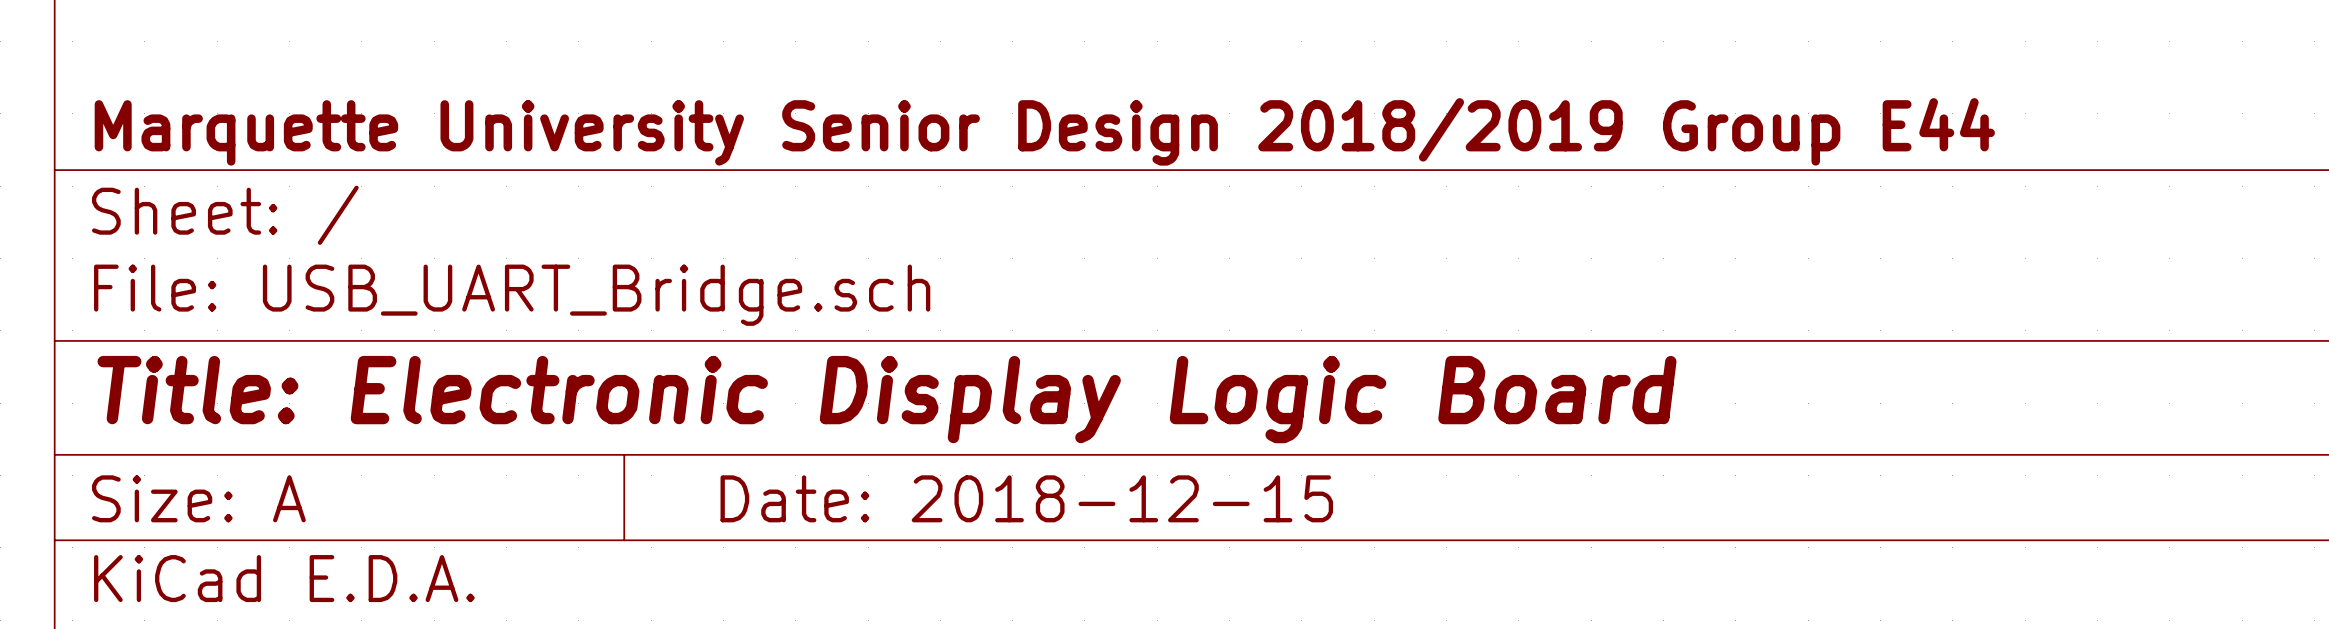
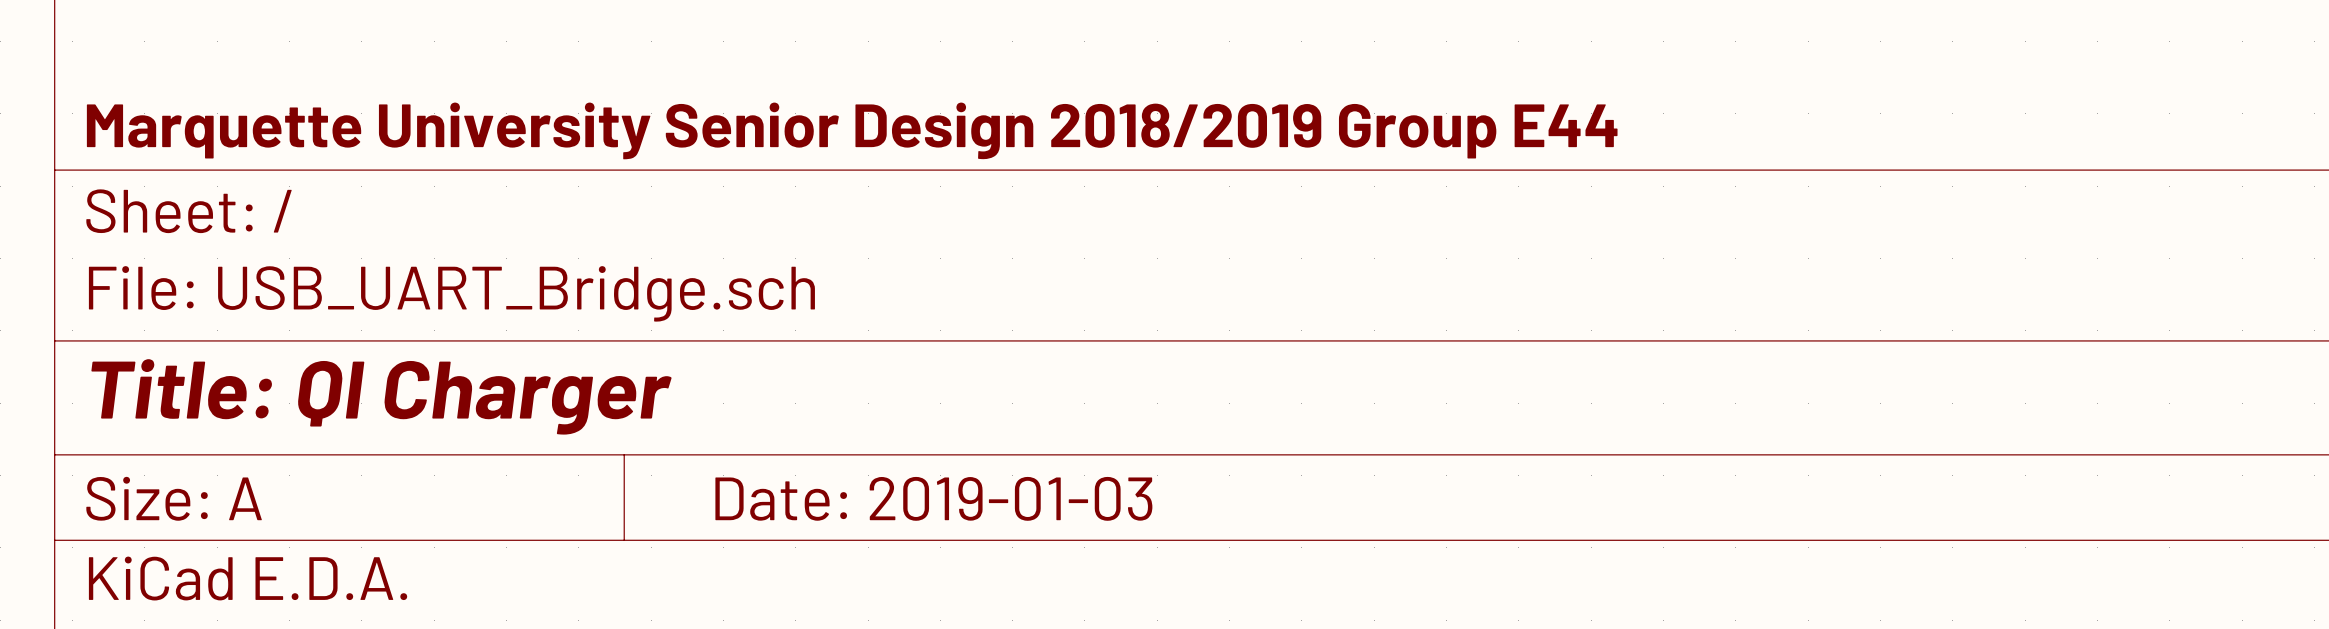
title block: Title: Electronic Display Logic Board (887, 399) -> Title: QI Charger (381, 396)
title block: Date: 2018-12-15 (1026, 498) -> Date: 2019-01-03 (933, 498)

